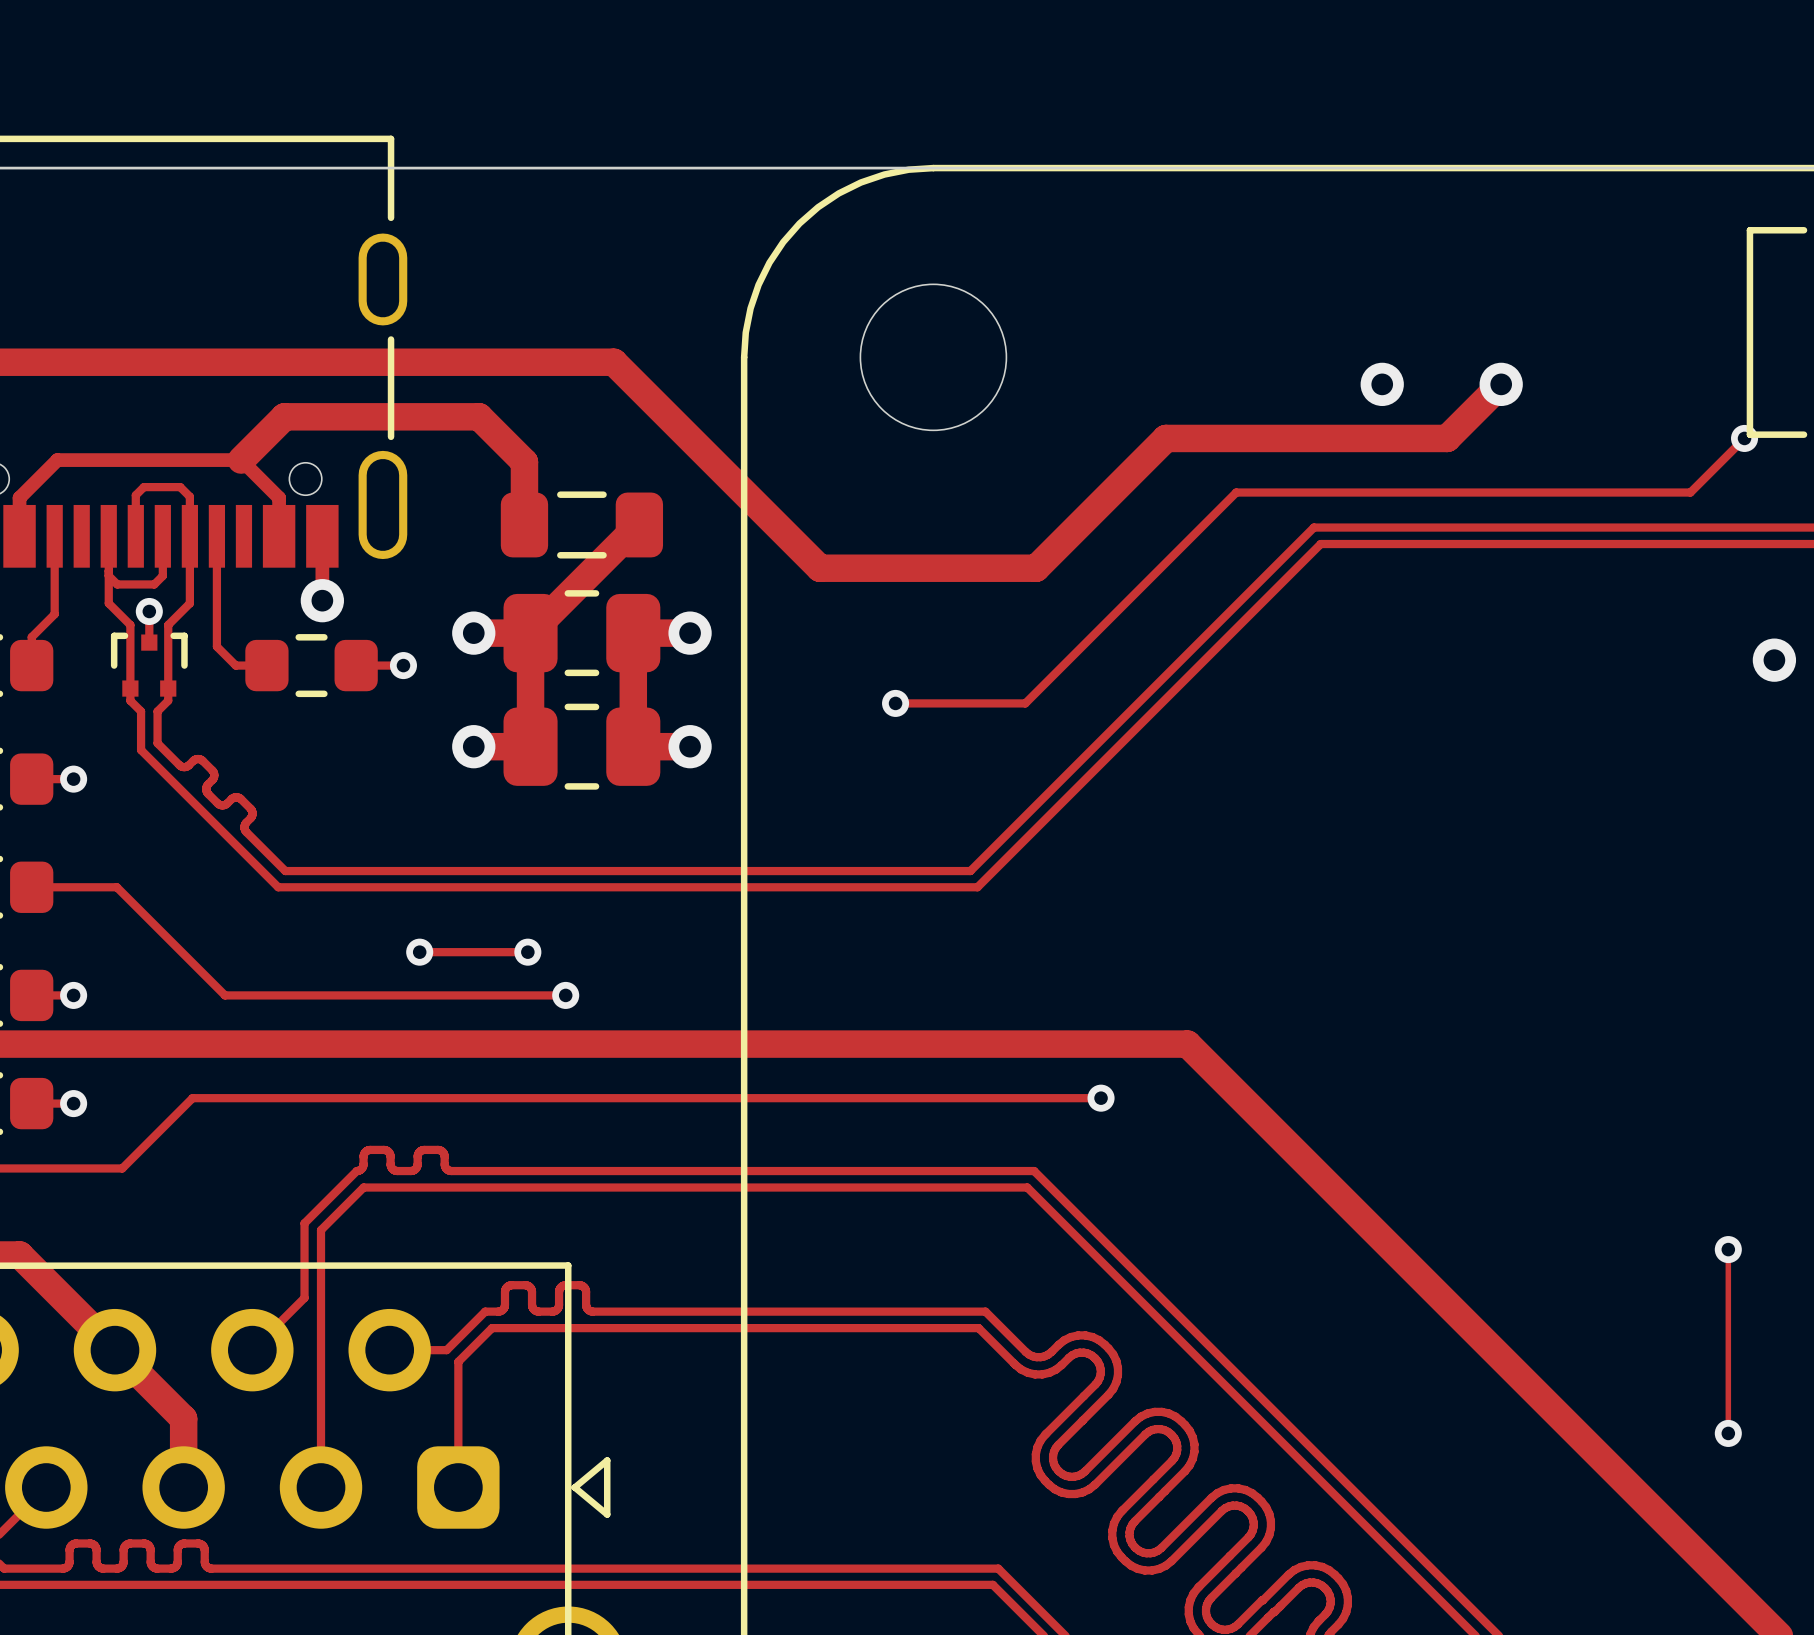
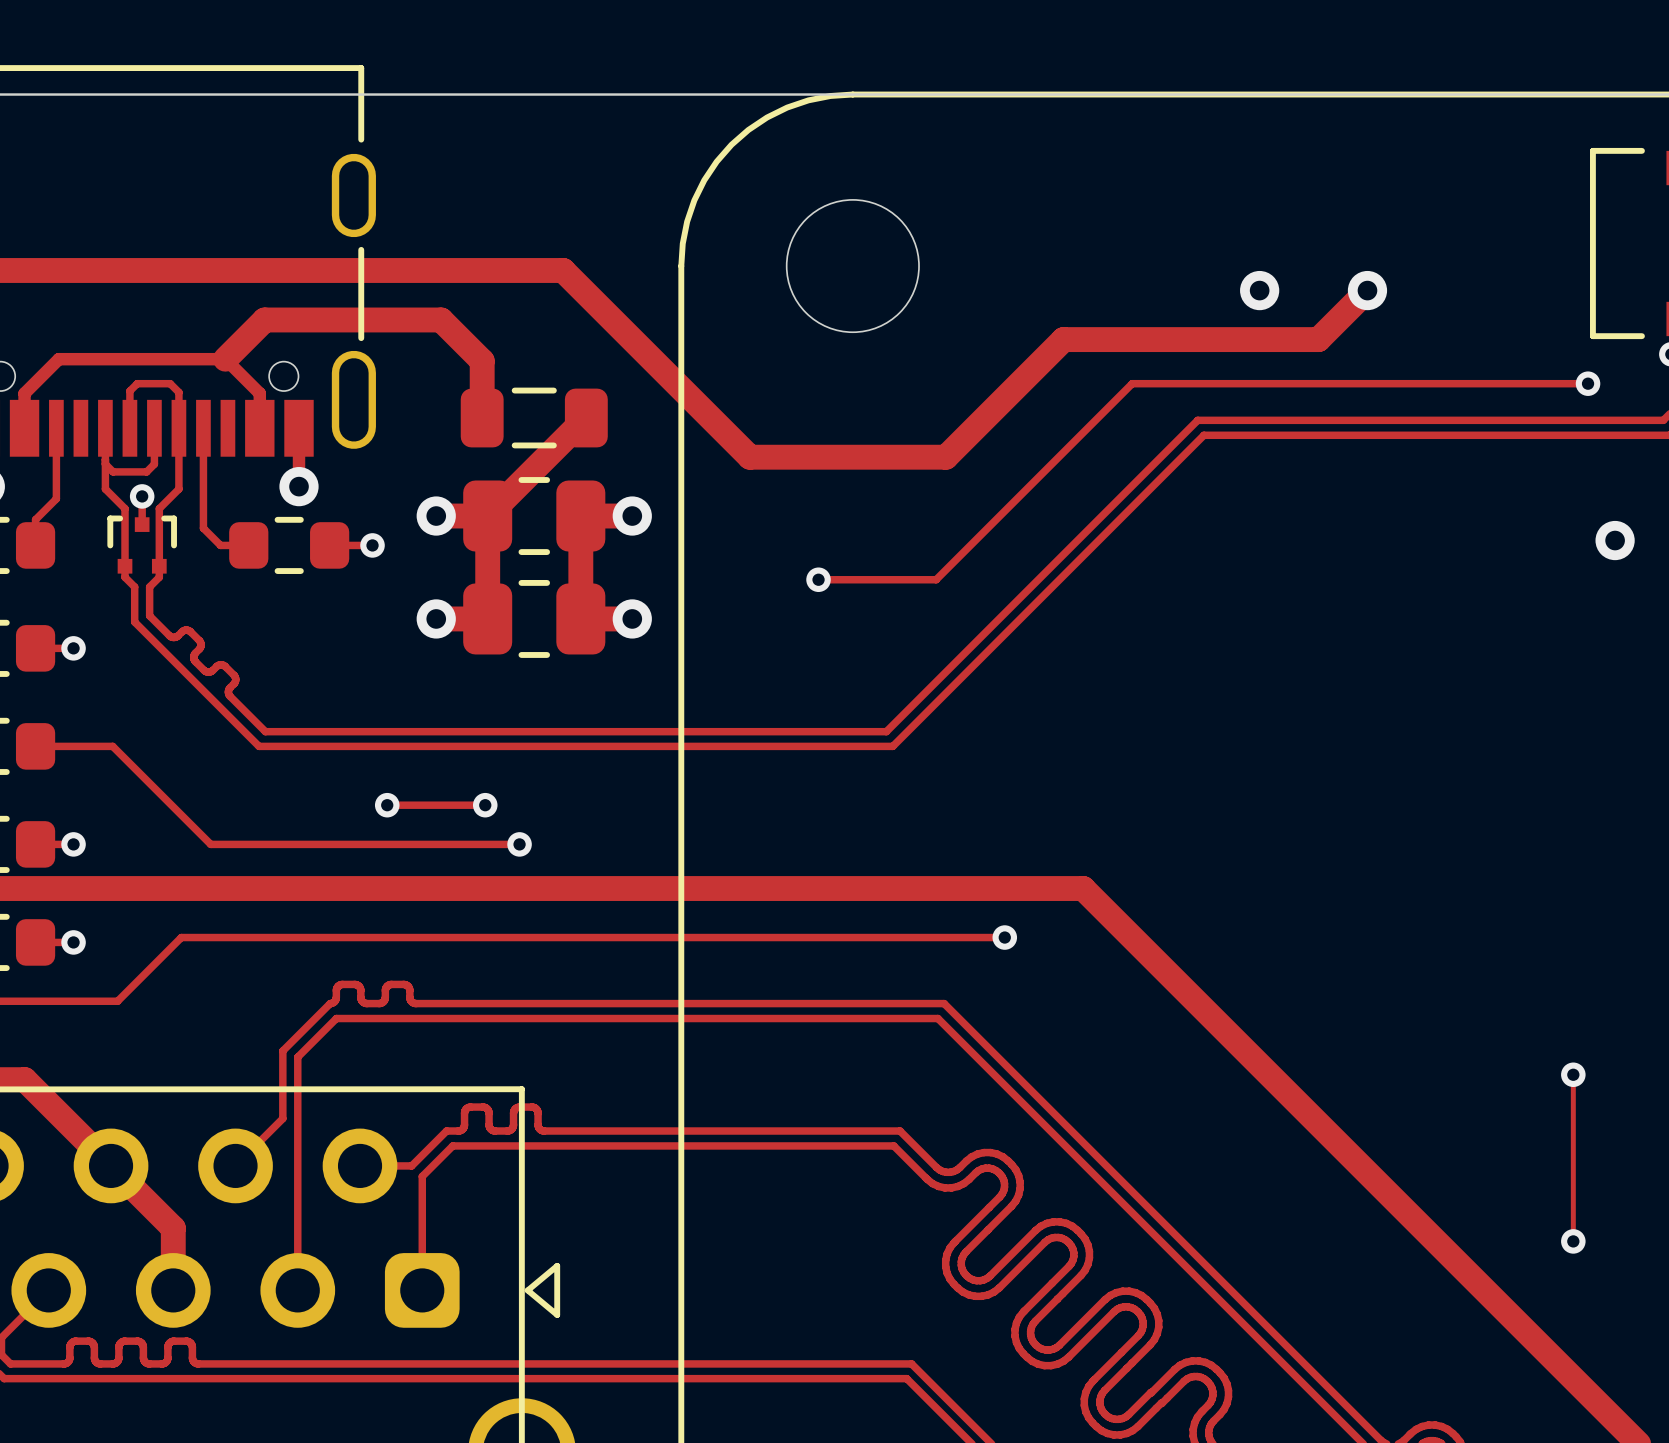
track: (1744, 438) (1690, 492) (1236, 492) -> (1588, 383) (1132, 383) (1127, 388)
via position: (1744, 438) -> (1588, 383)

